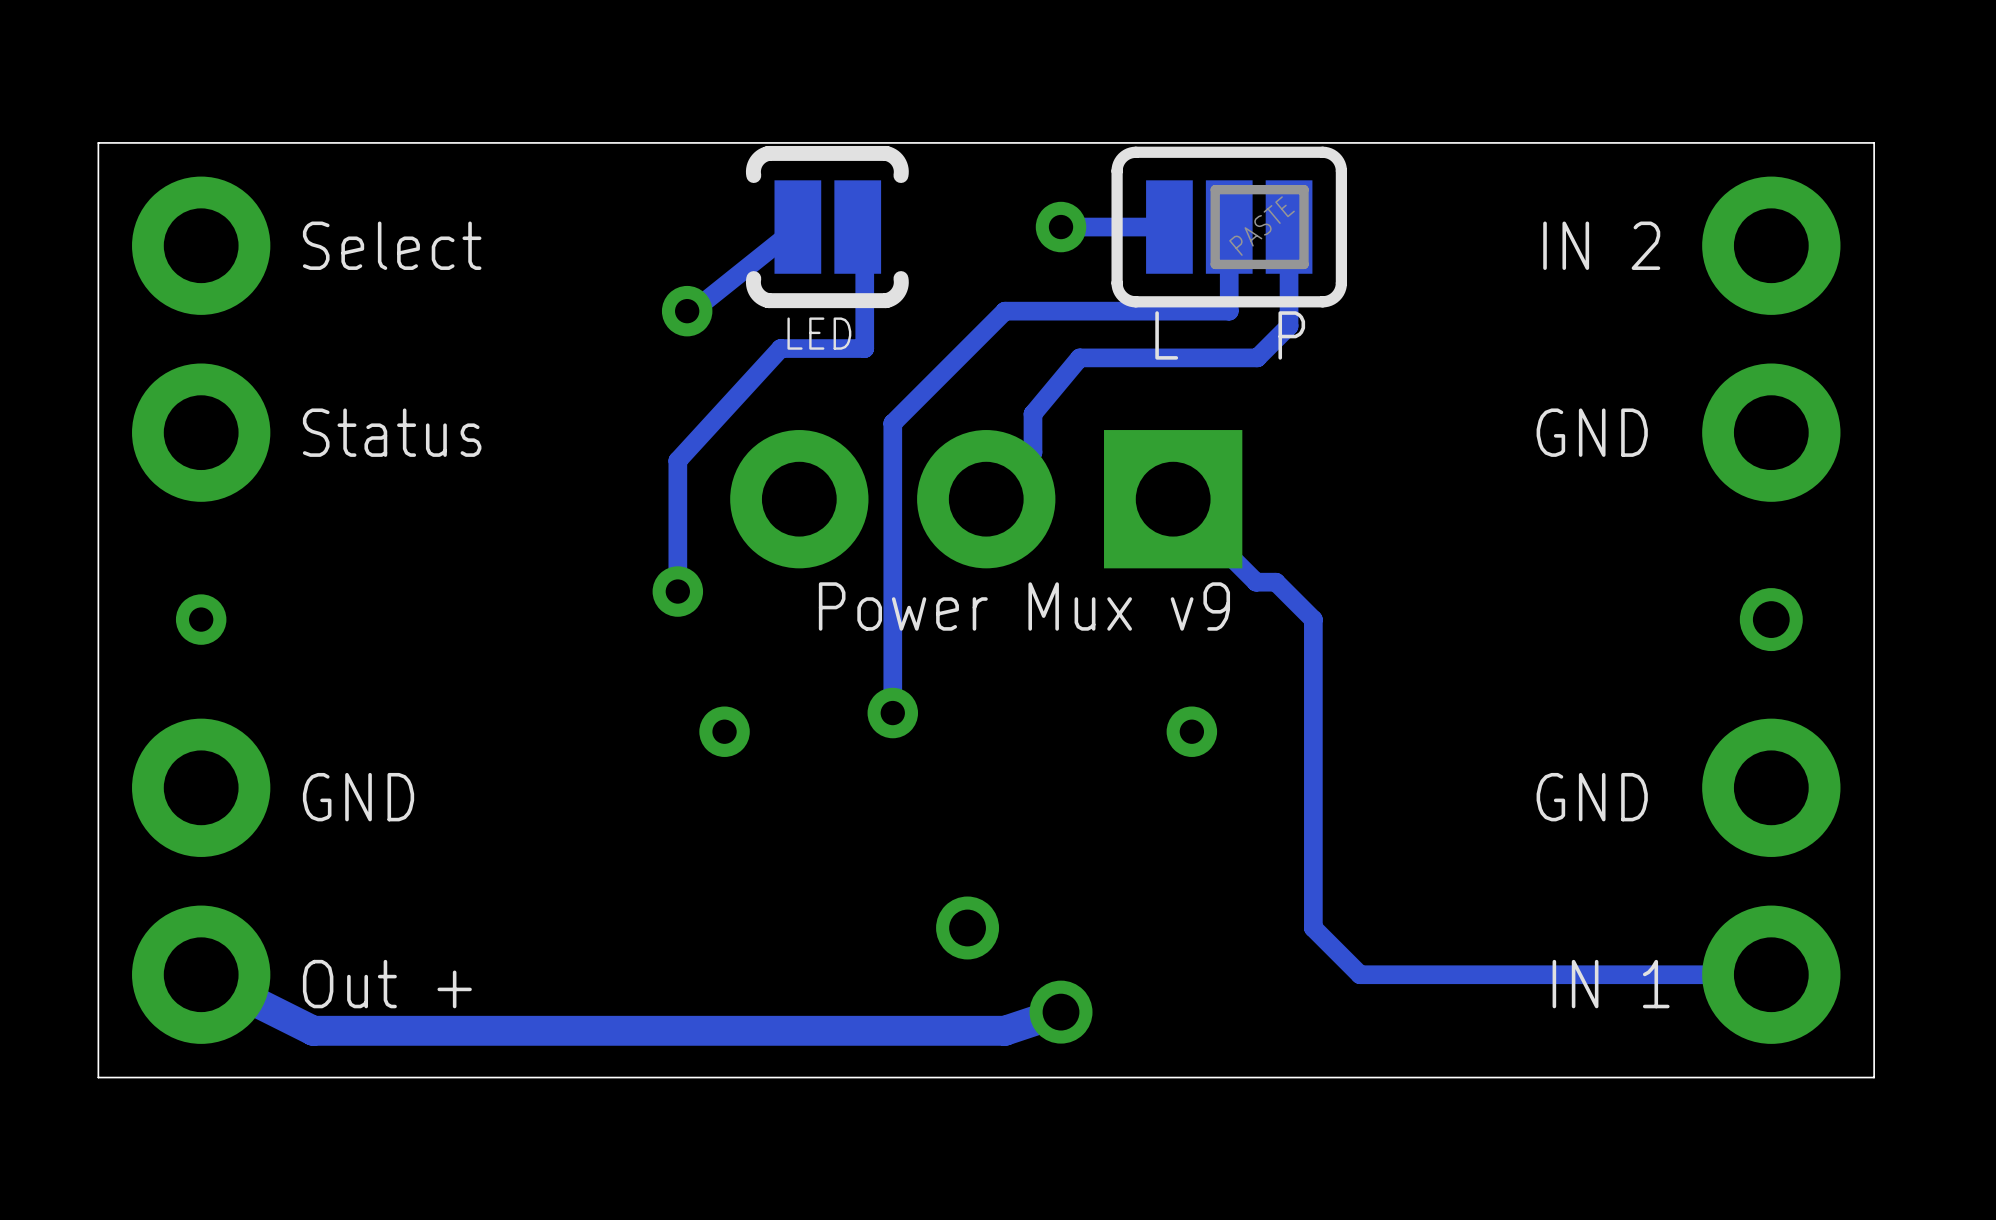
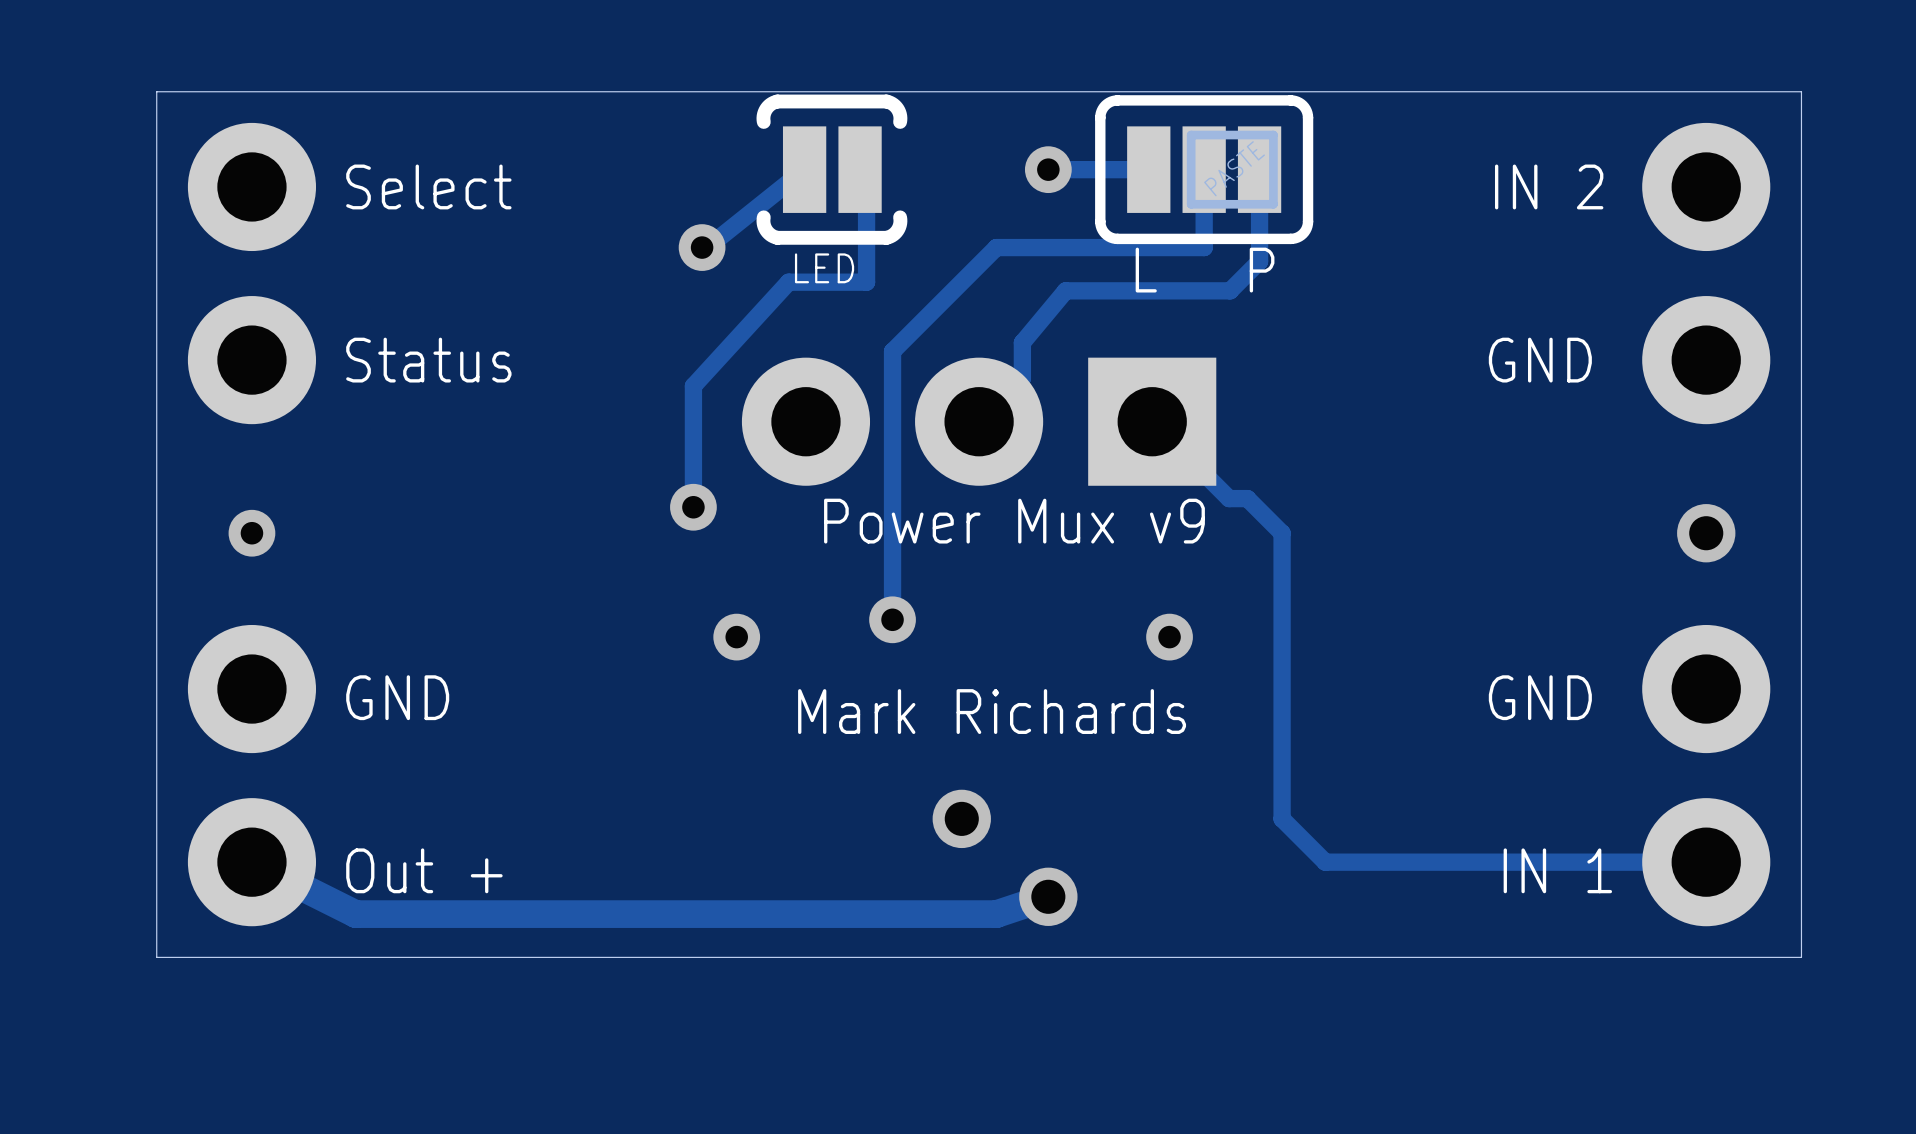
text: none -> Mark Richards (992, 711)

